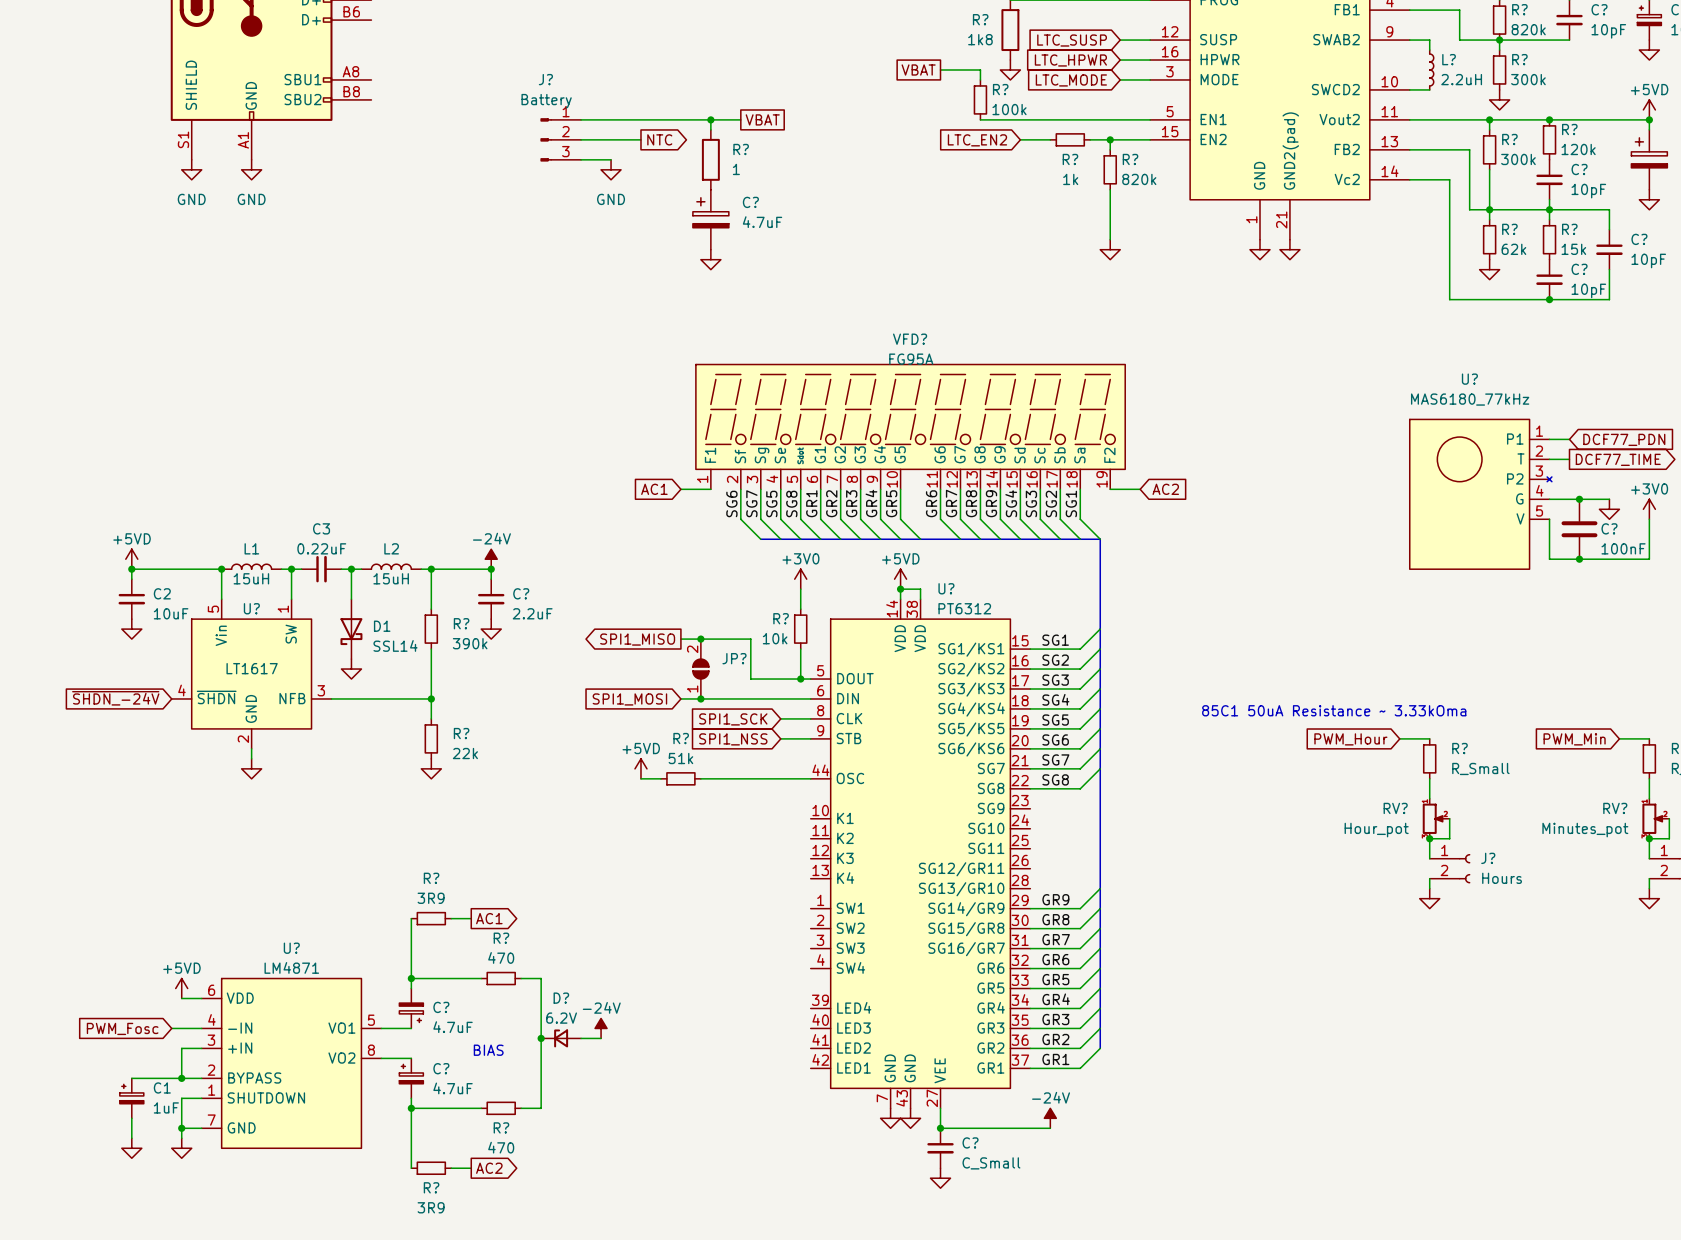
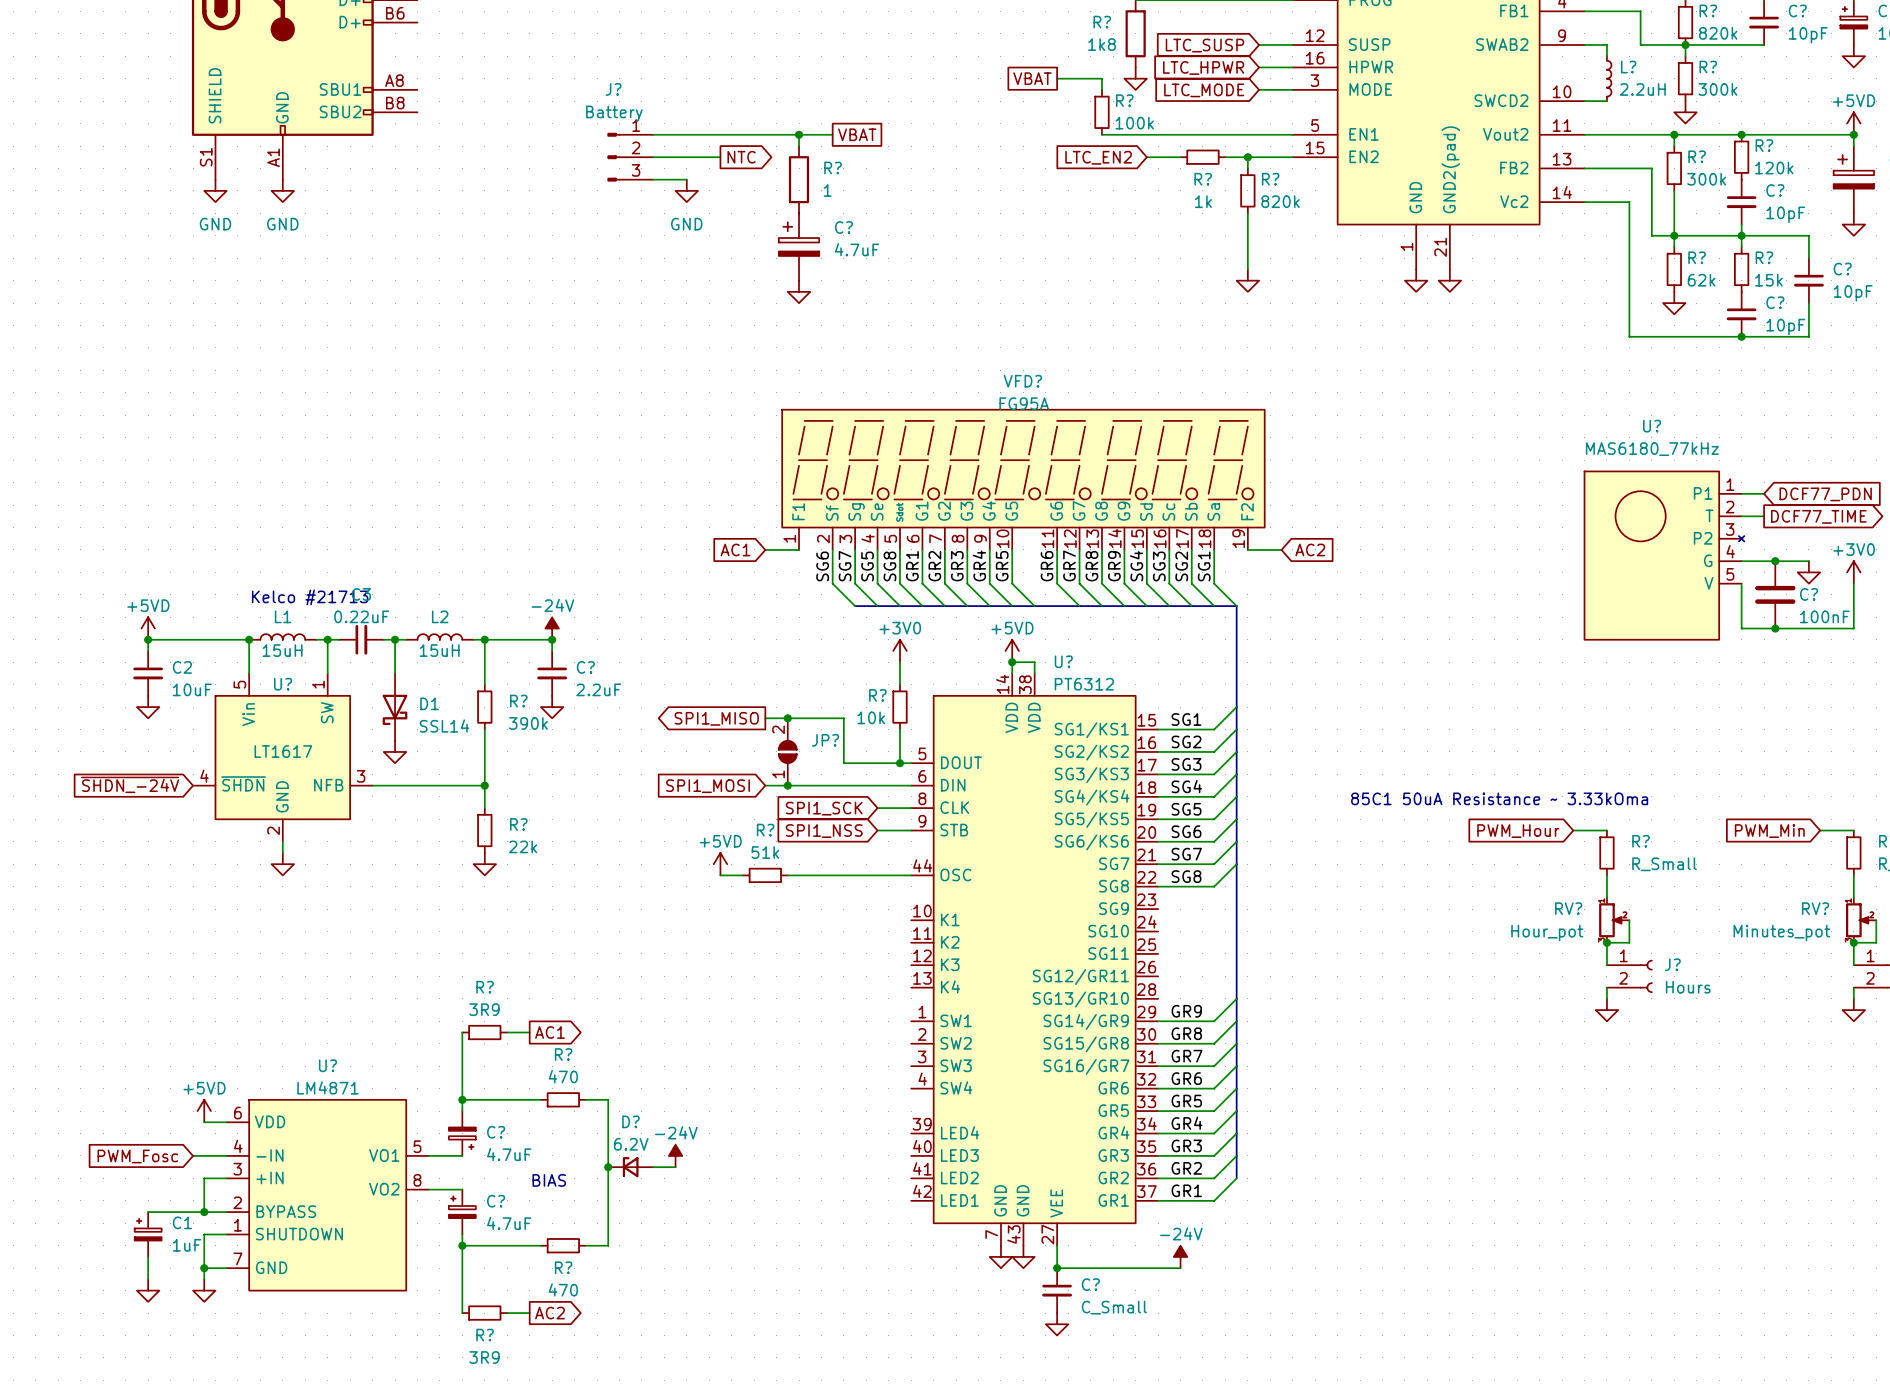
text: none -> Kelco #21713 (310, 597)

